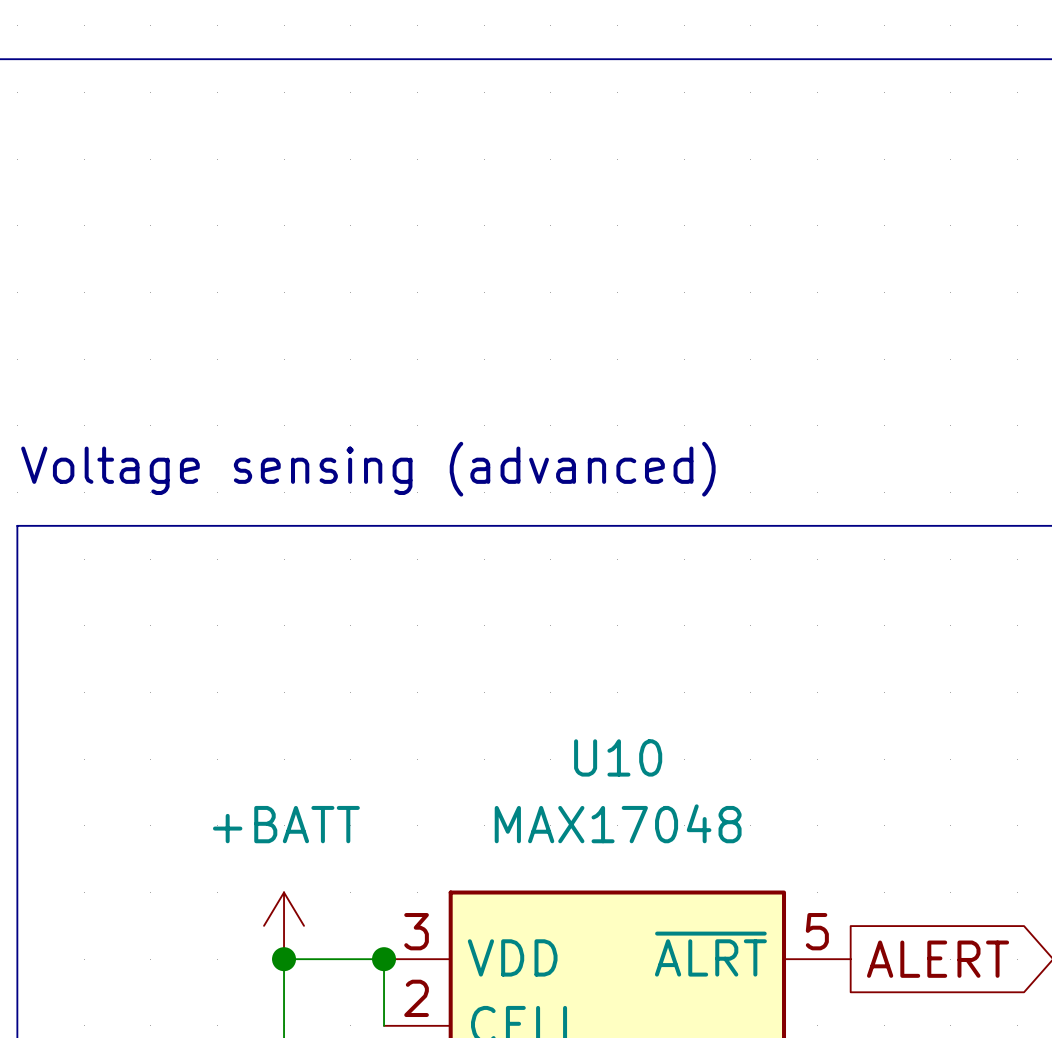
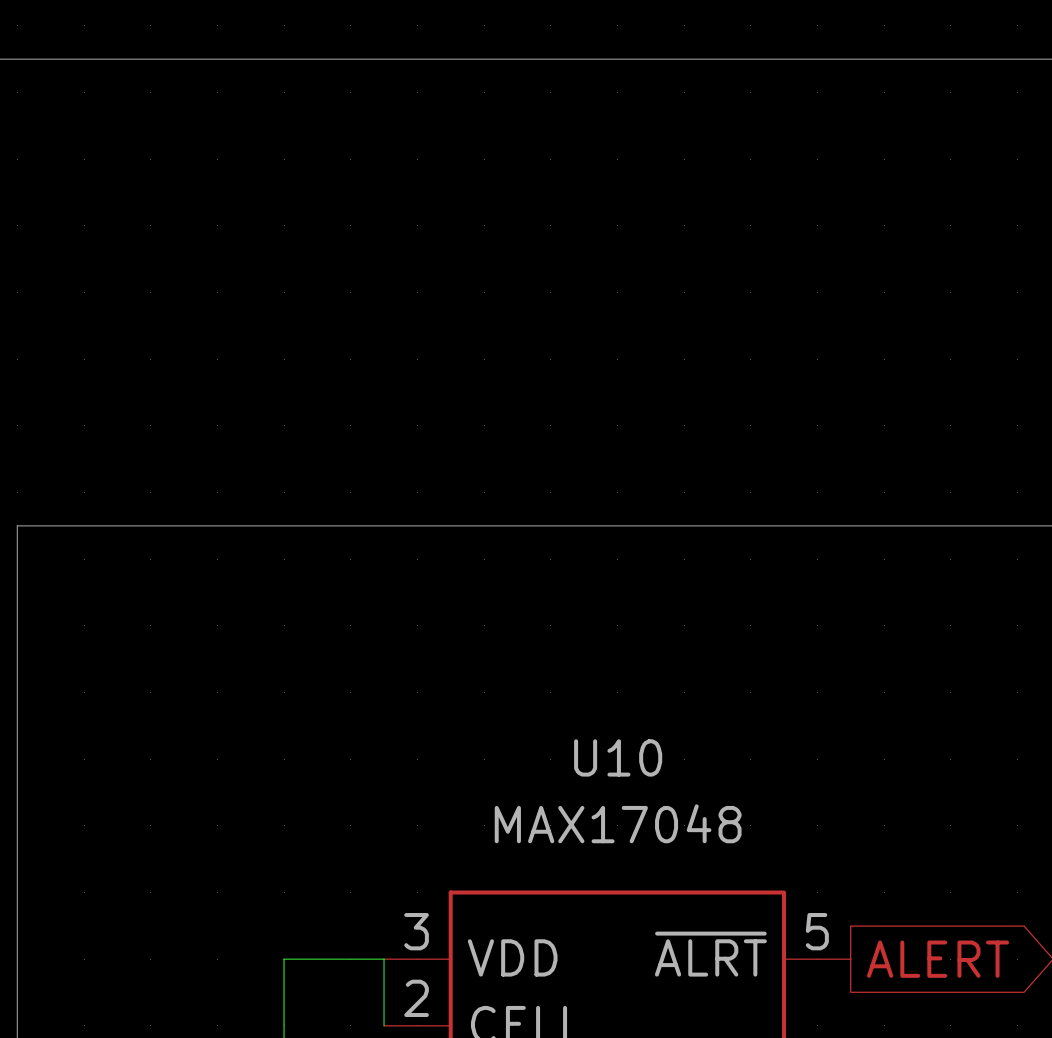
text: Voltage sensing (advanced) (368, 469) -> none
power symbol: +BATT (284, 925) -> none
junction: (284, 959) -> none
junction: (384, 959) -> none

